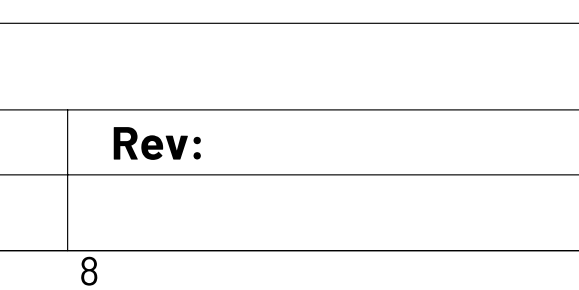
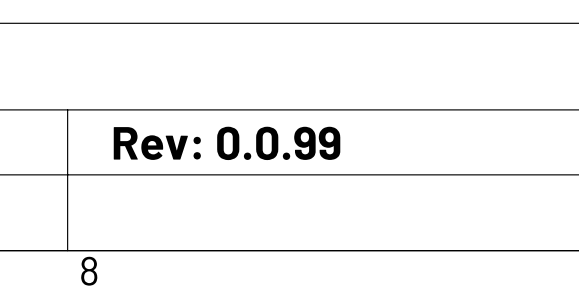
title block: Rev: (157, 143) -> Rev: 0.0.99 (227, 143)

